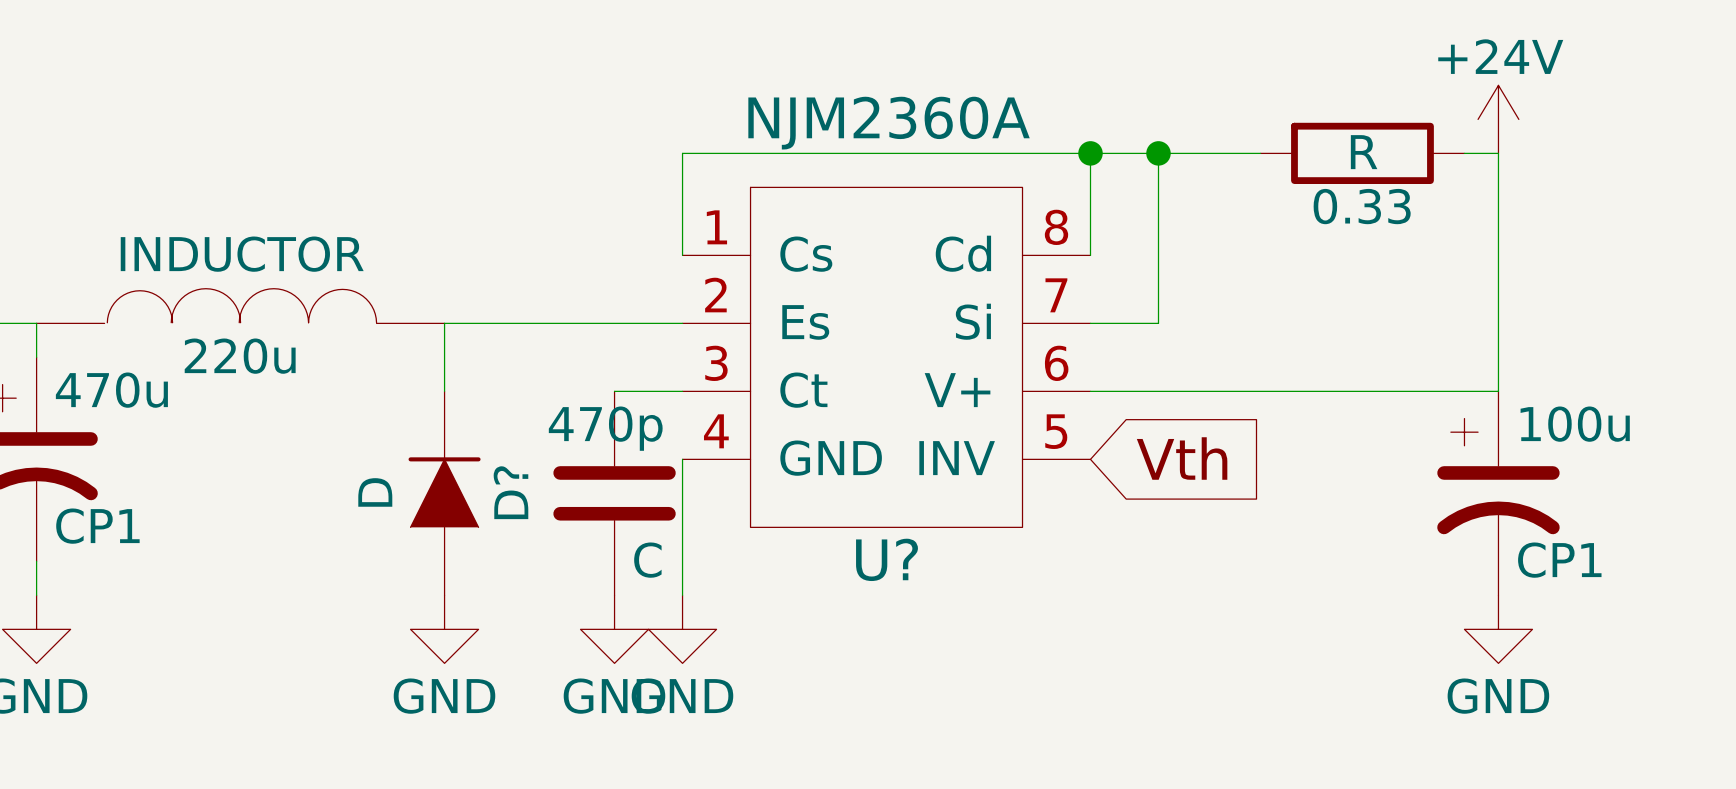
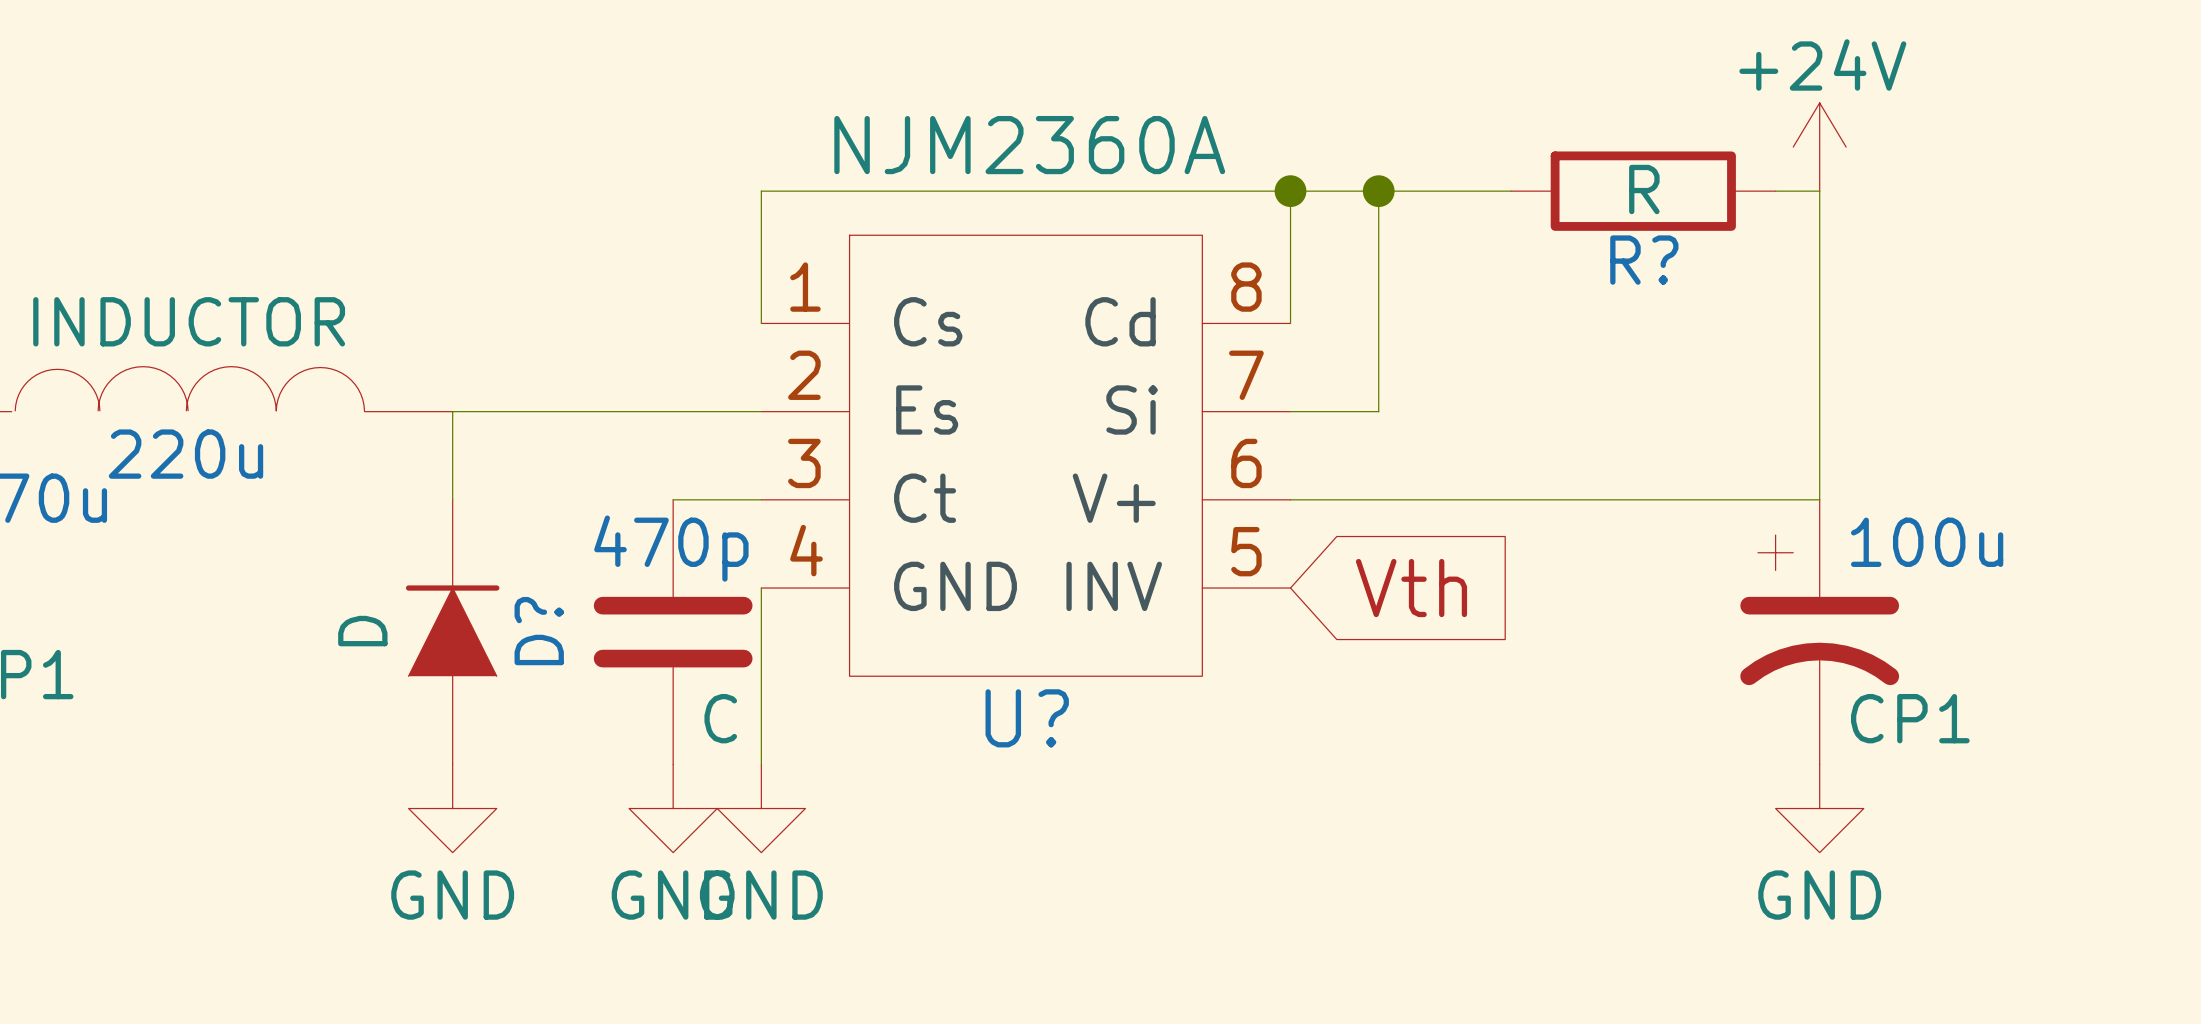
0.33 name: 0.33 (1362, 206) -> R? (1644, 260)

